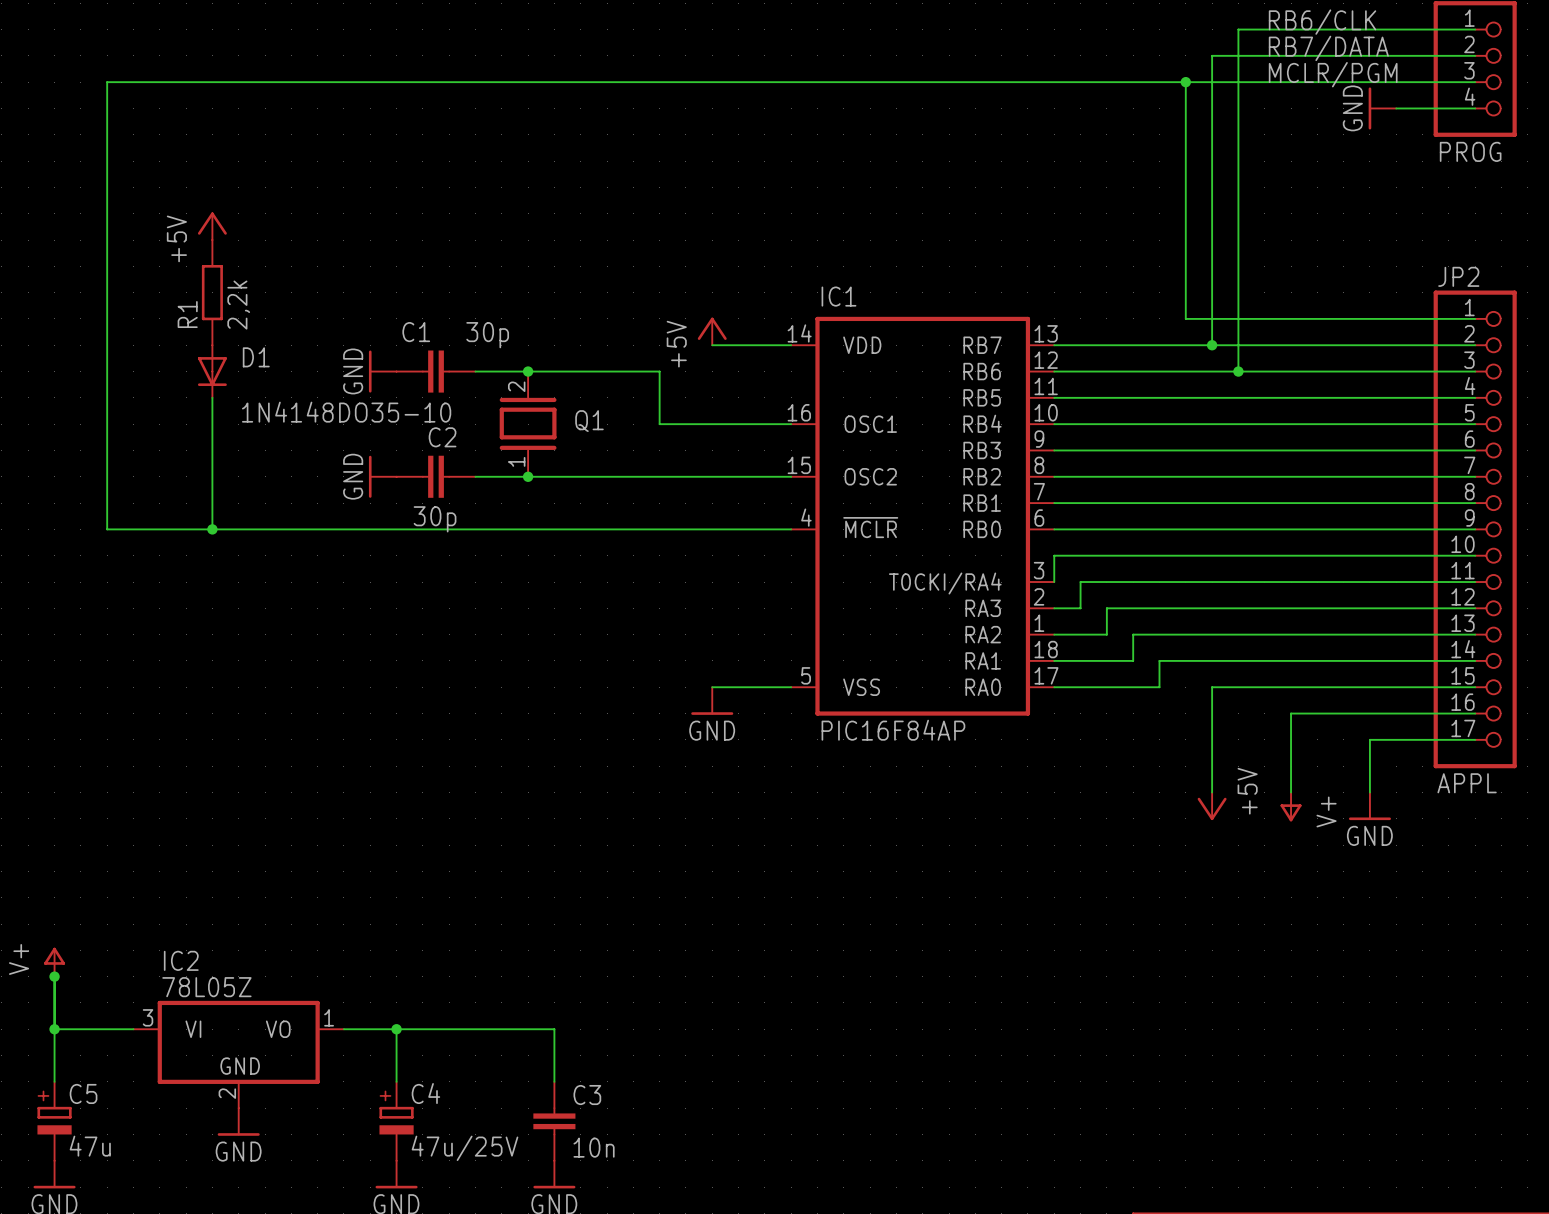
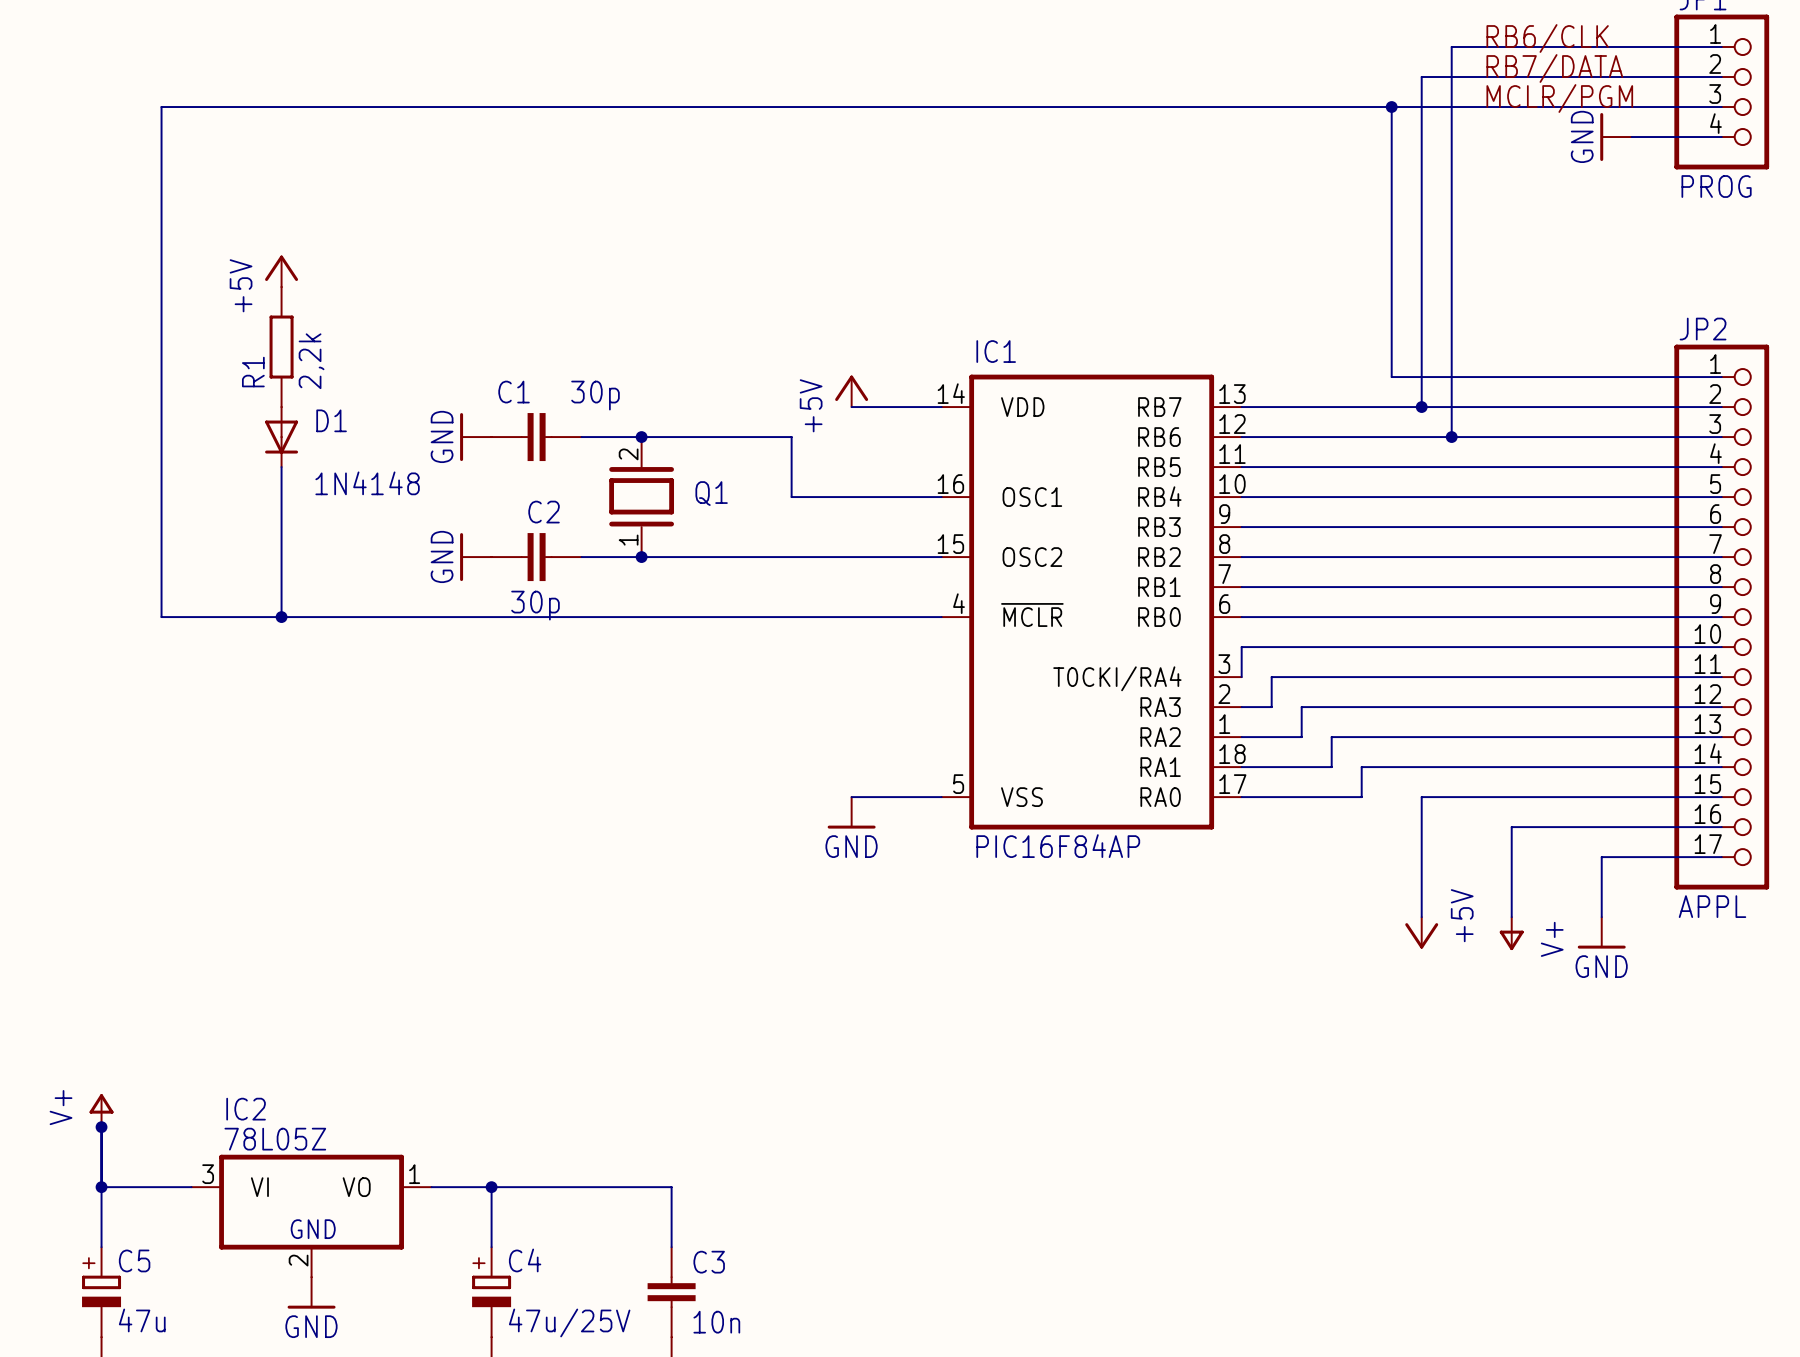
D1 value: 1N4148DO35-10 (346, 412) -> 1N4148 (367, 483)

